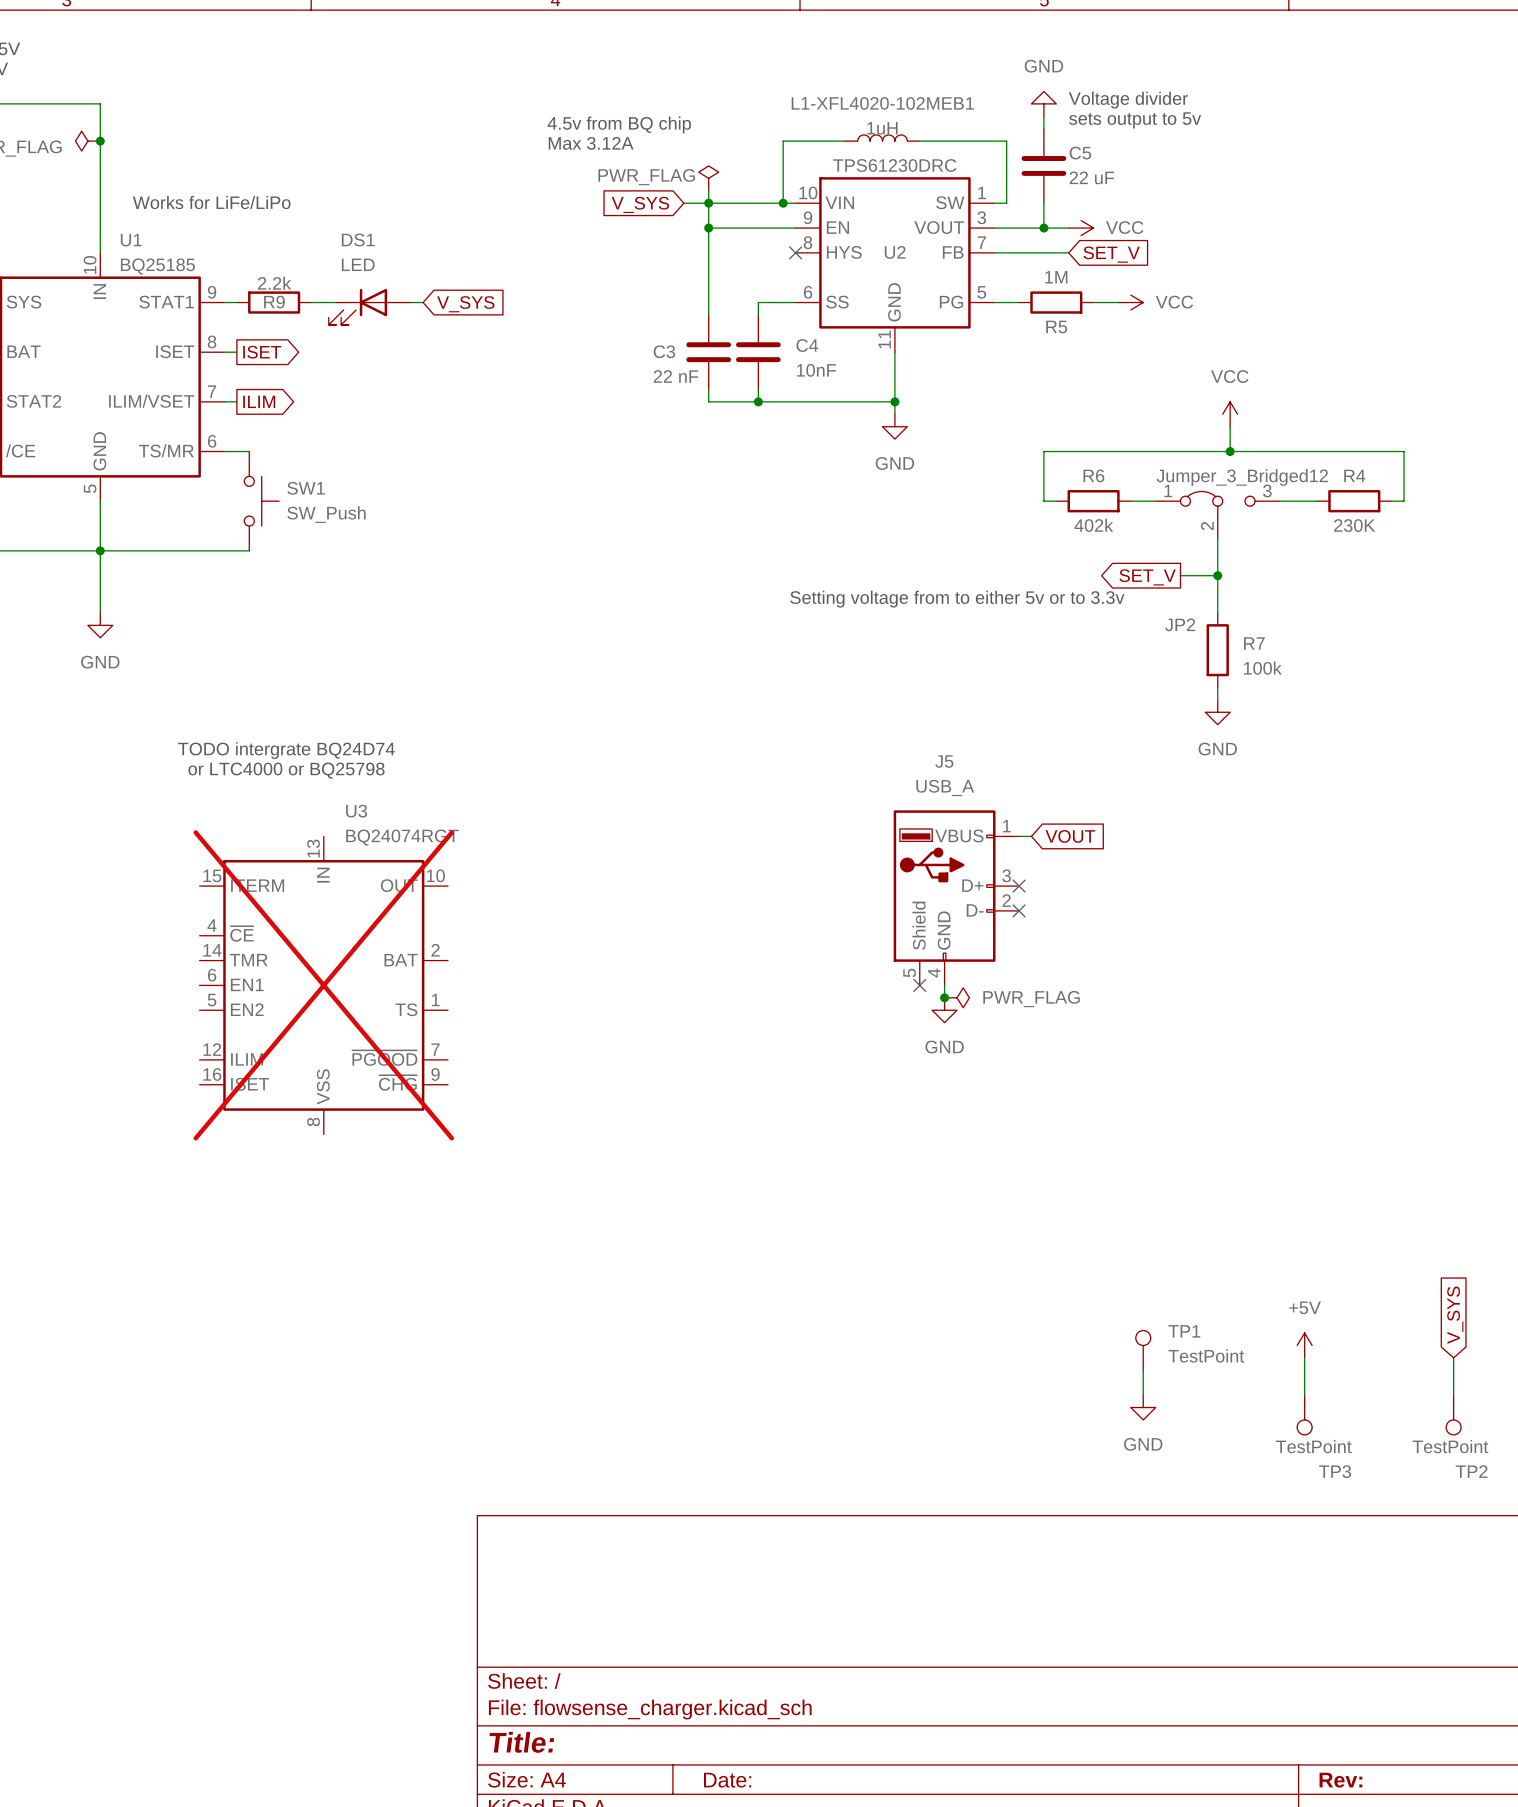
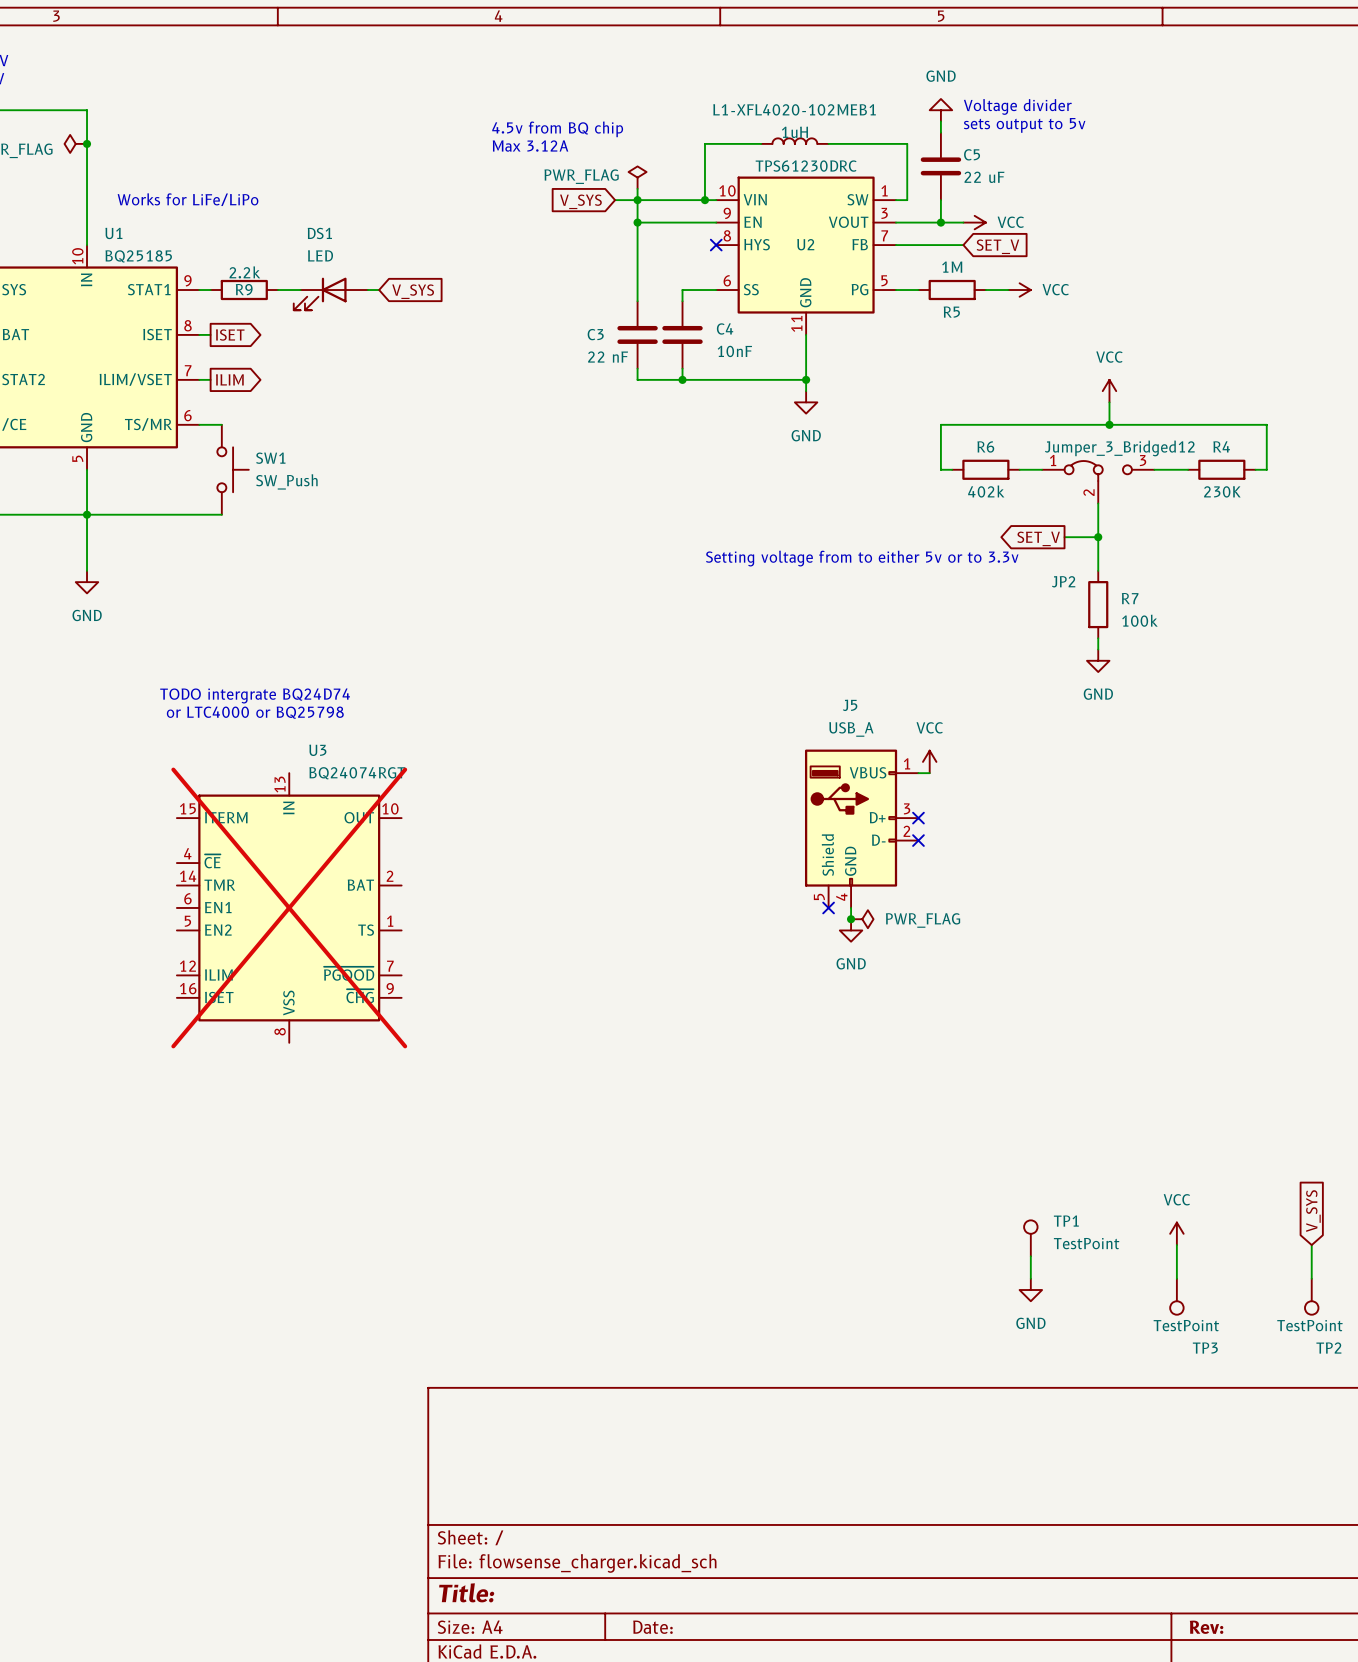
power symbol: none -> VCC (929, 761)
global label: VOUT (1070, 836) -> none
power symbol: +5V (1304, 1345) -> VCC (1176, 1233)

